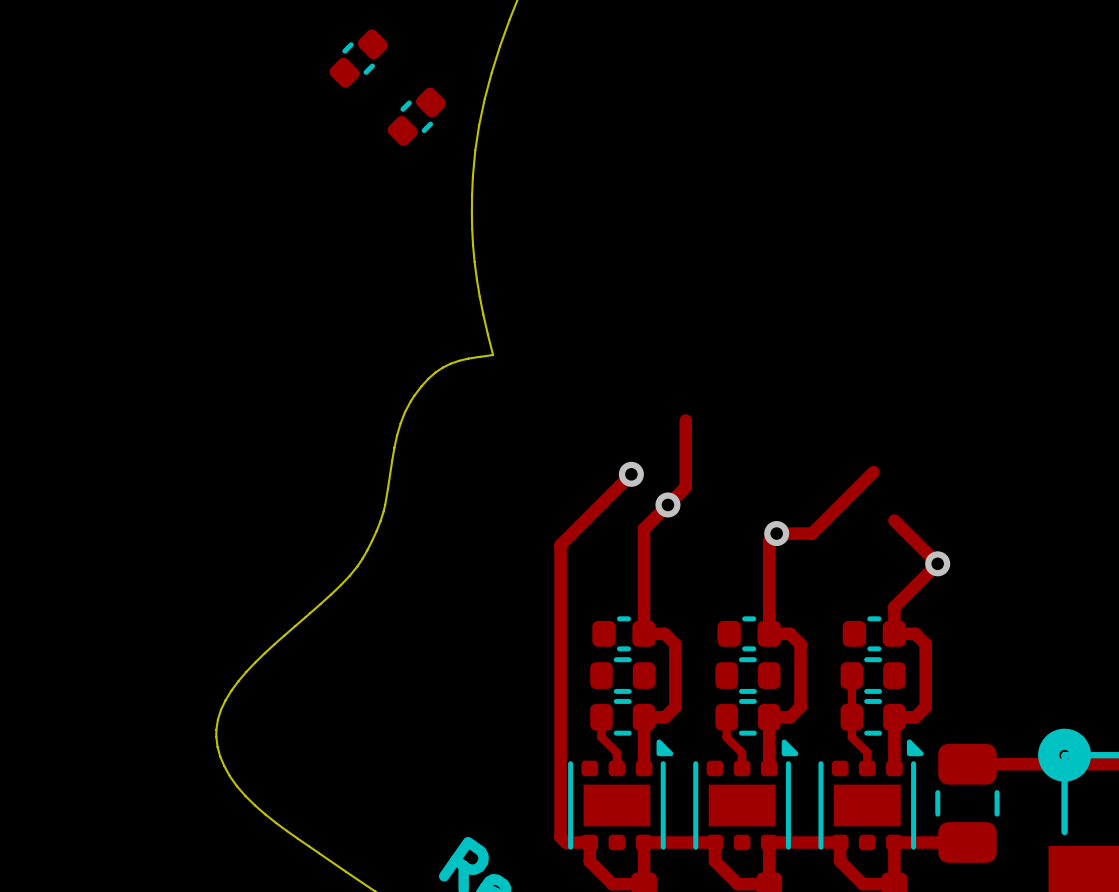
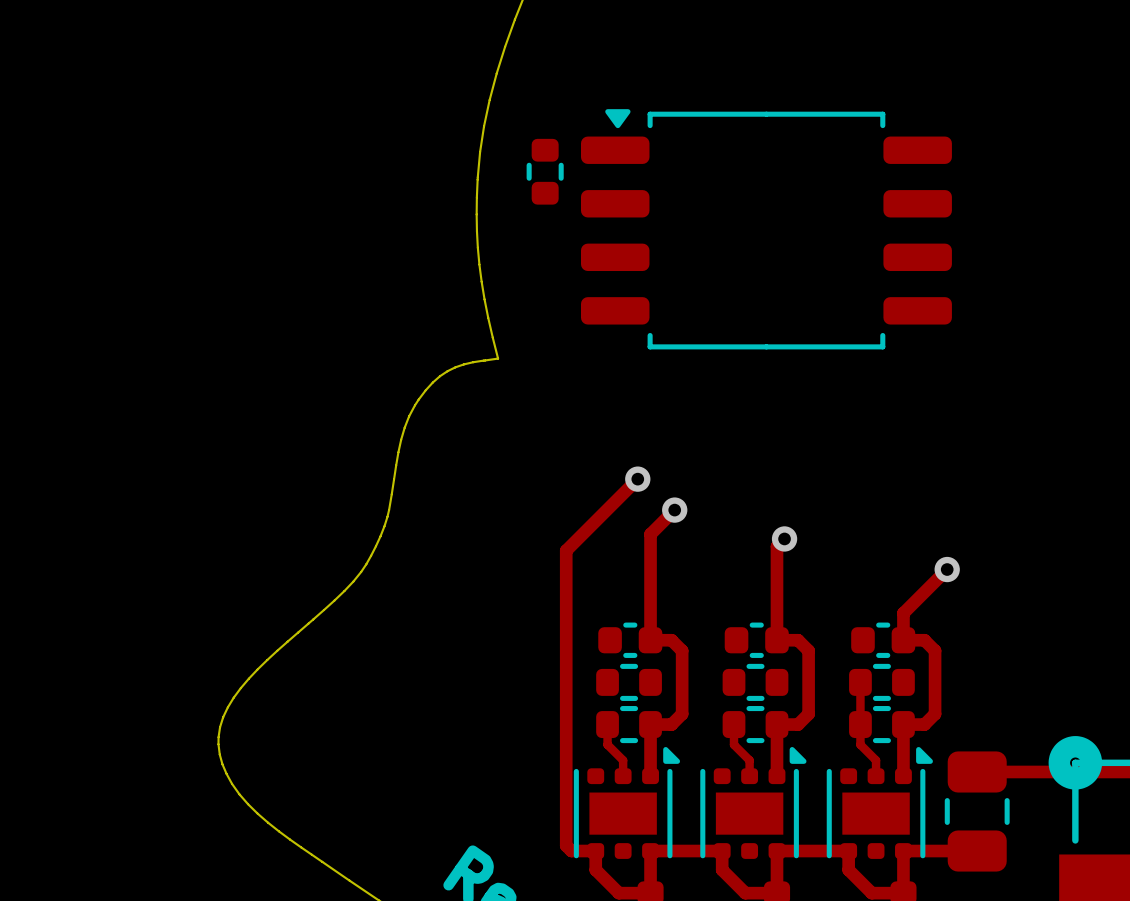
part: (358, 58) -> none
part: (416, 116) -> none
part: none -> (545, 171)
part: none -> (766, 229)
track: (685, 420) (685, 487) (667, 504) -> none
track: (873, 472) (812, 533) (776, 533) -> none
track: (894, 520) (937, 563) -> none

